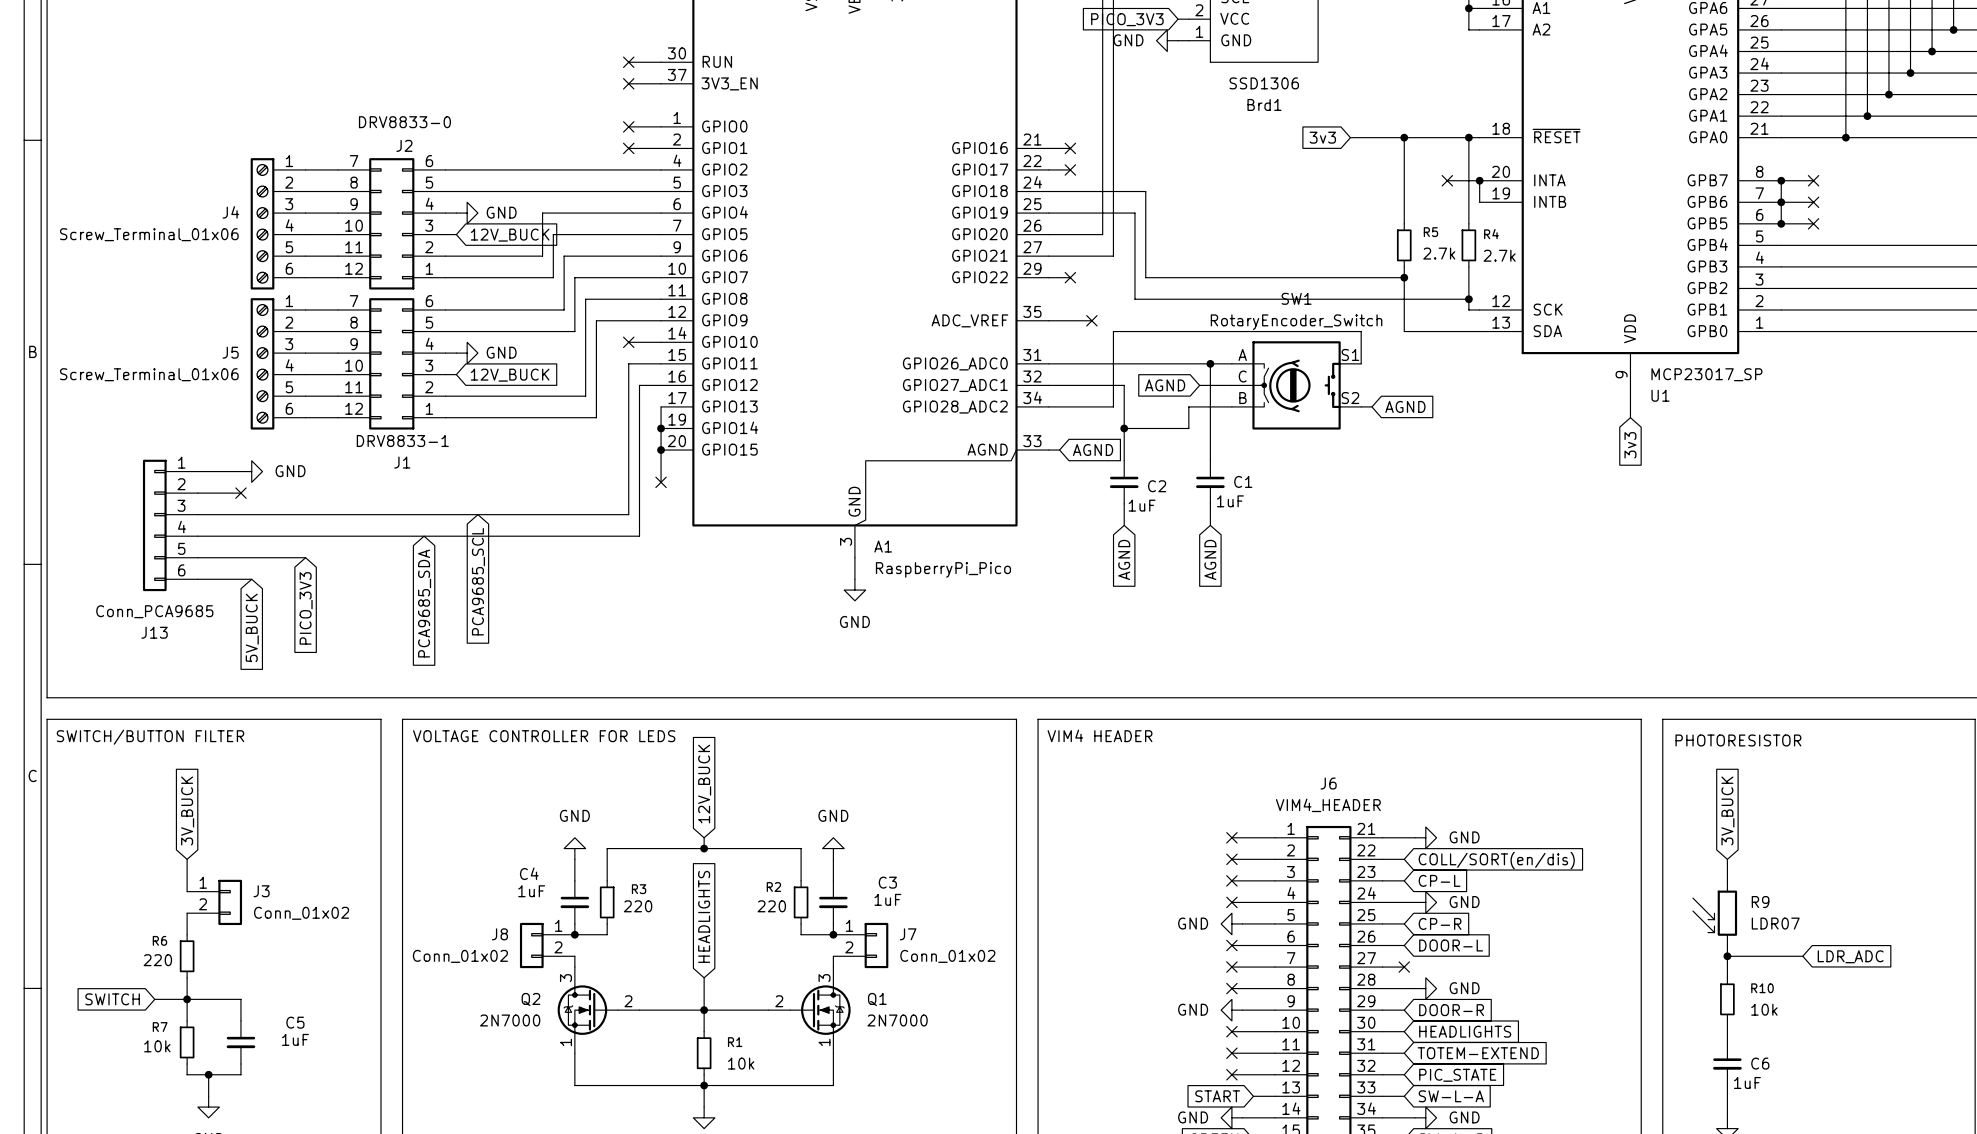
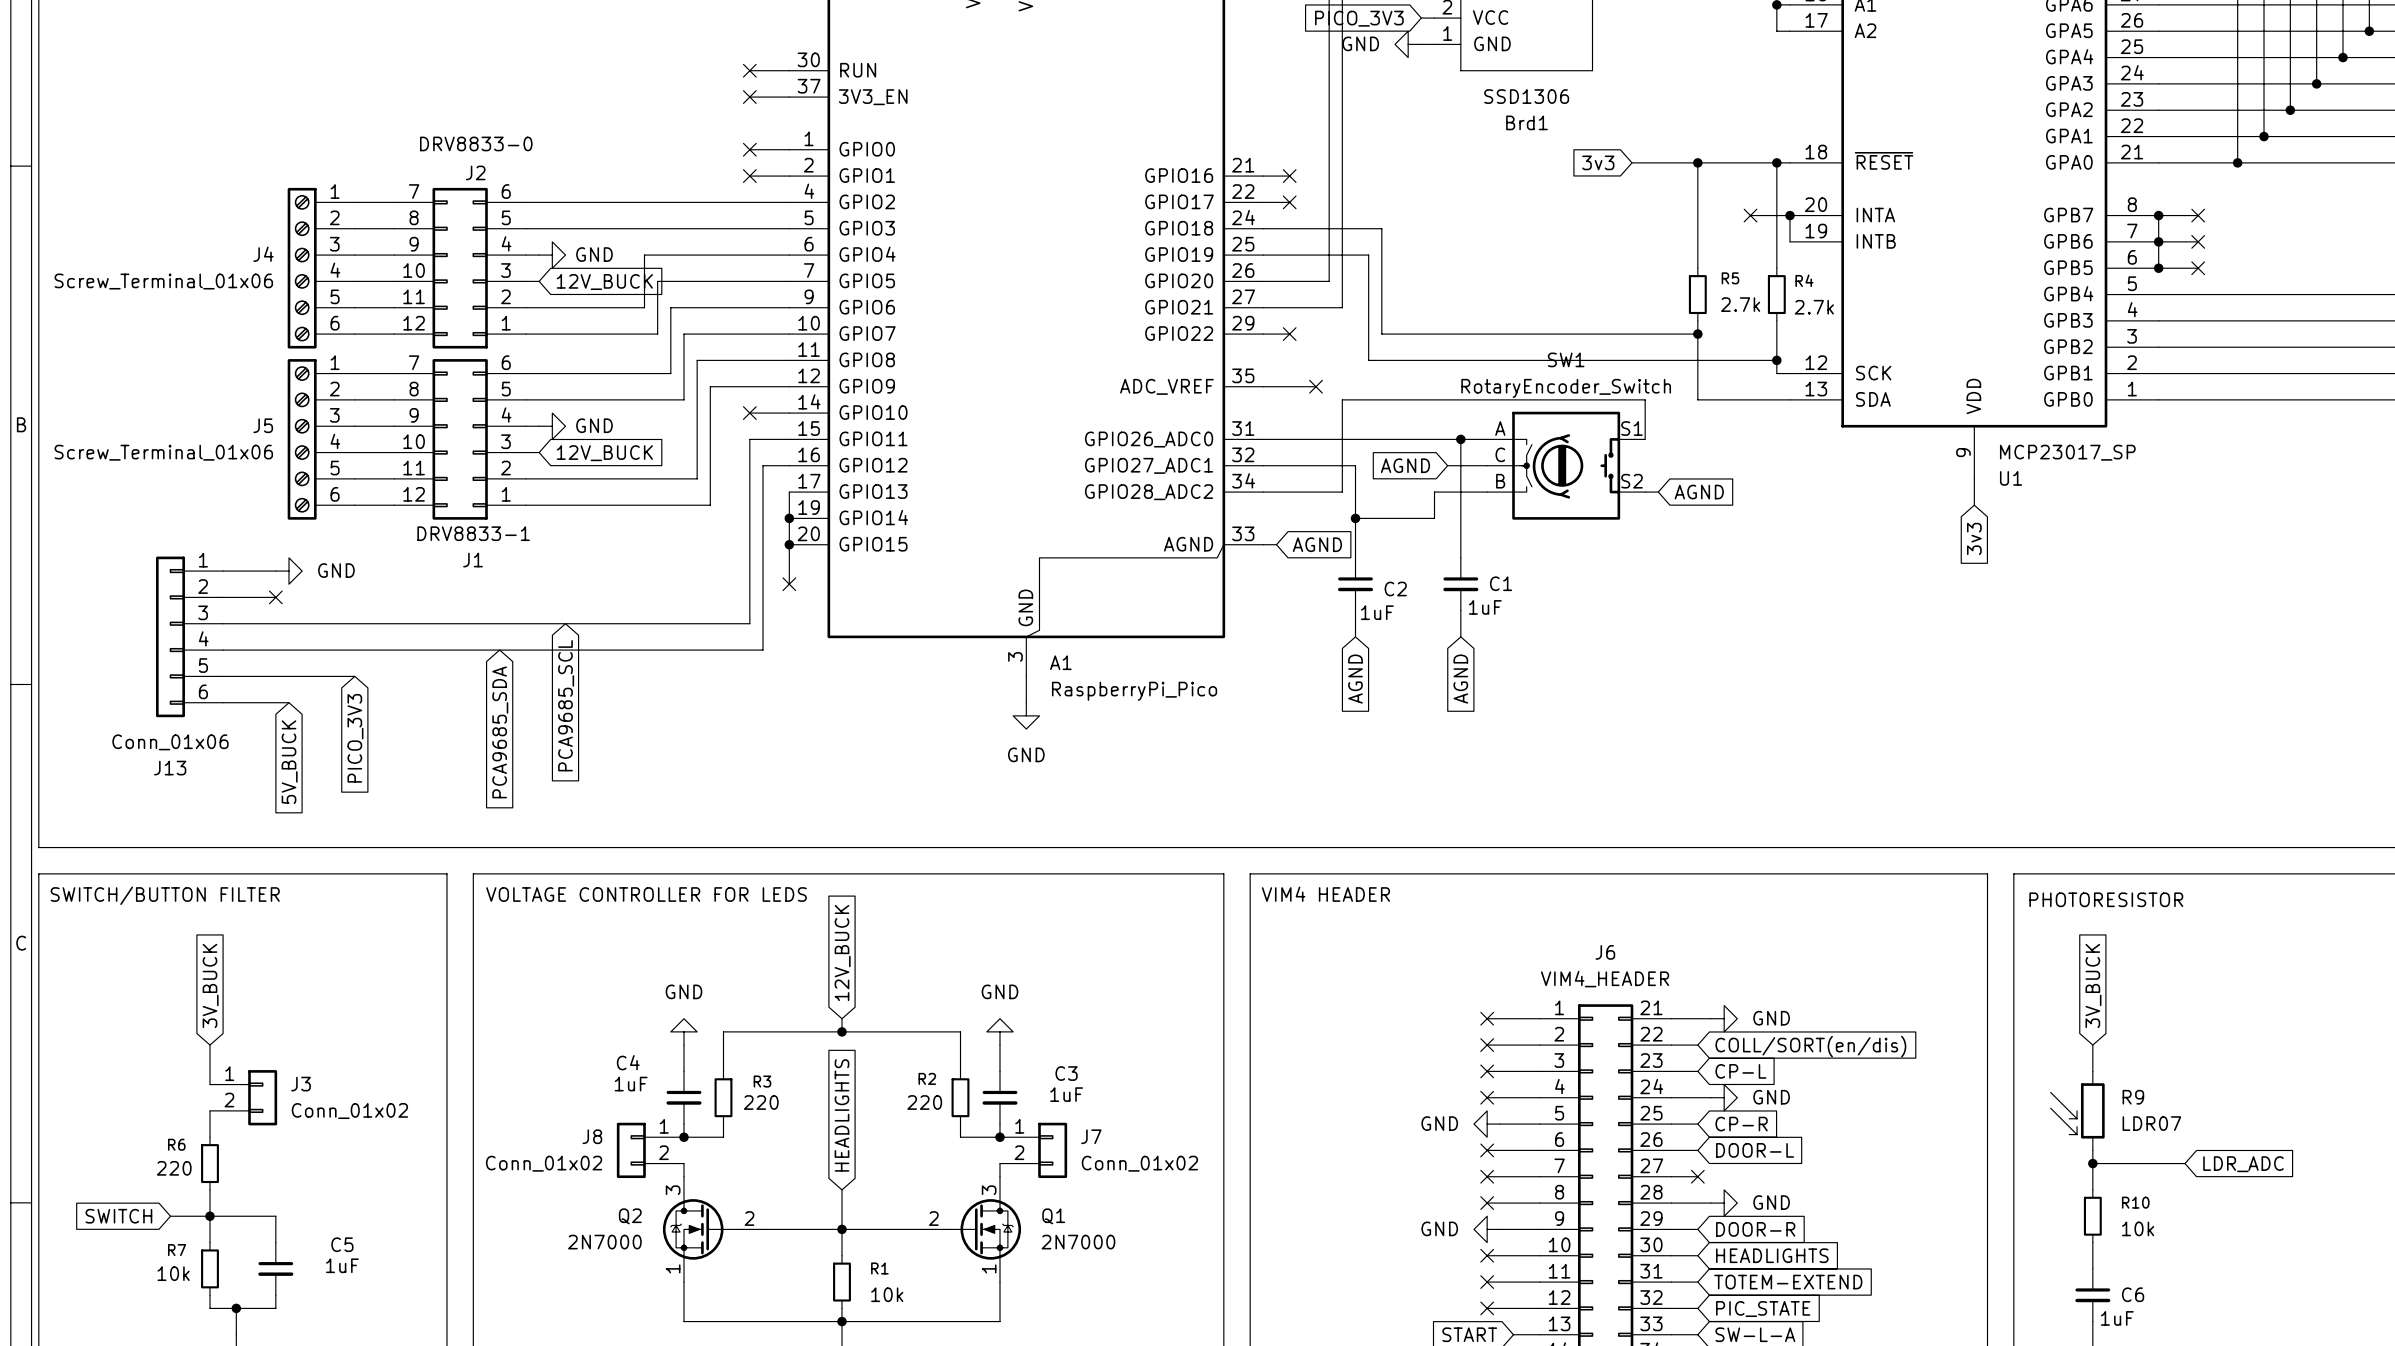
J13 value: Conn_PCA9685 (154, 611) -> Conn_01x06 (170, 742)

